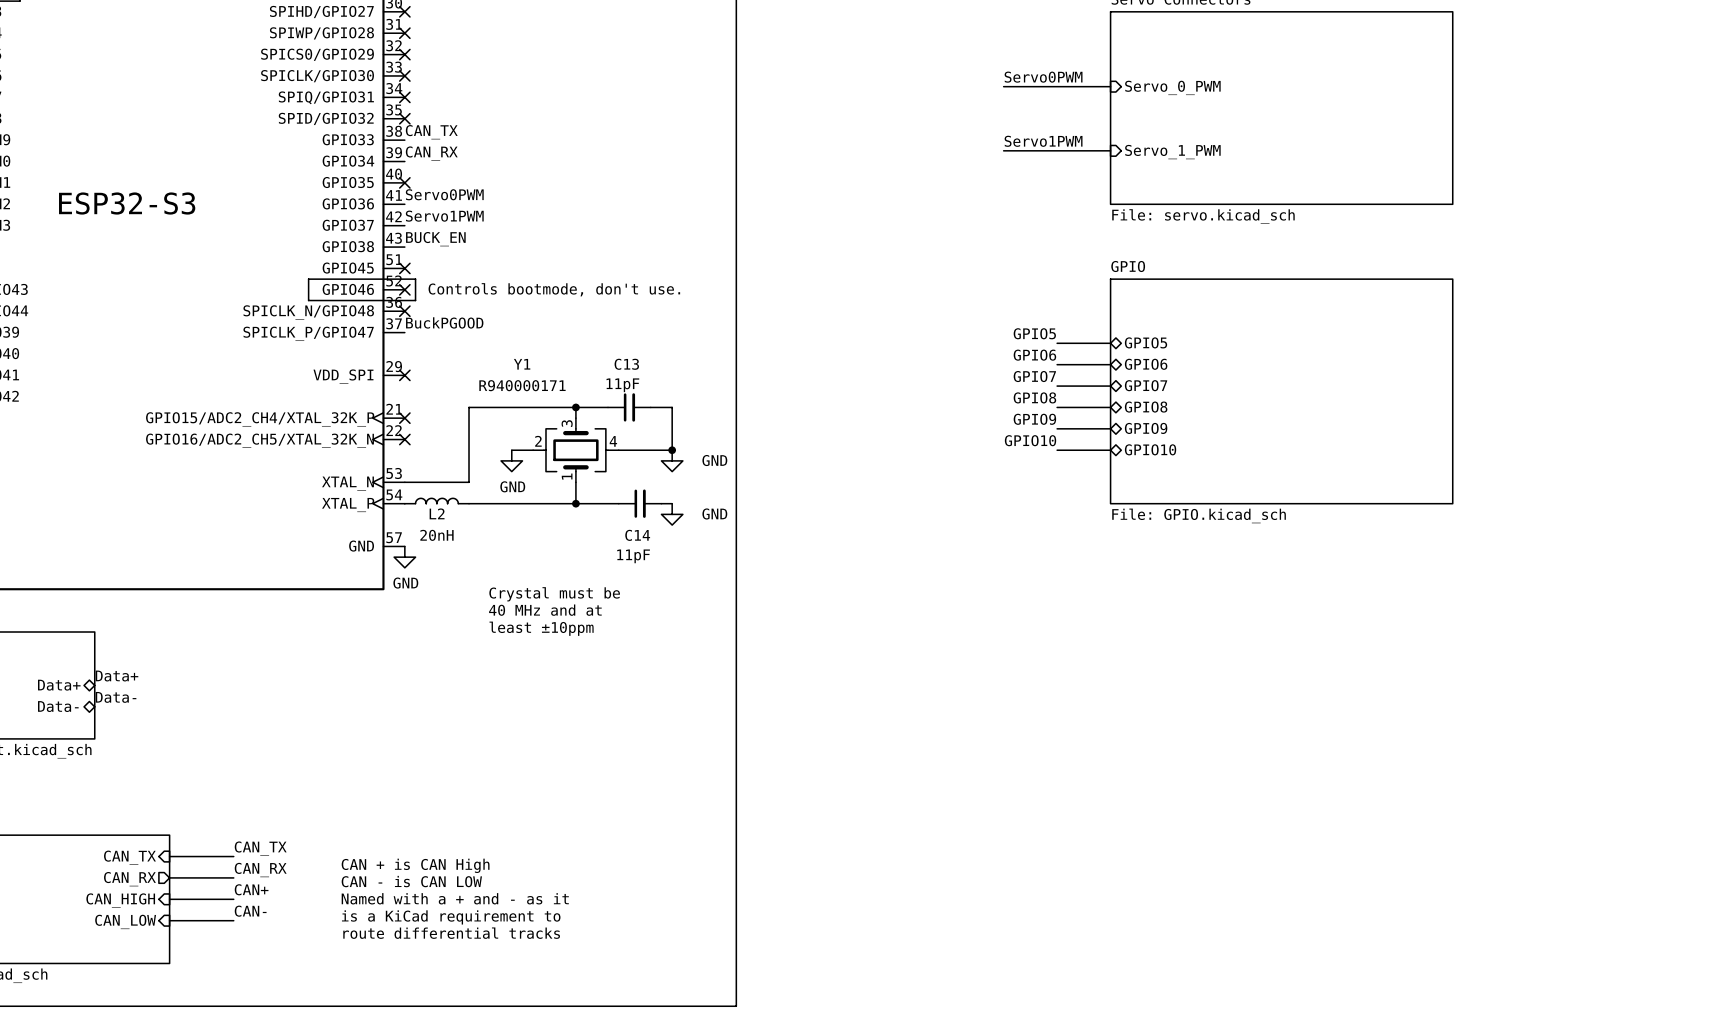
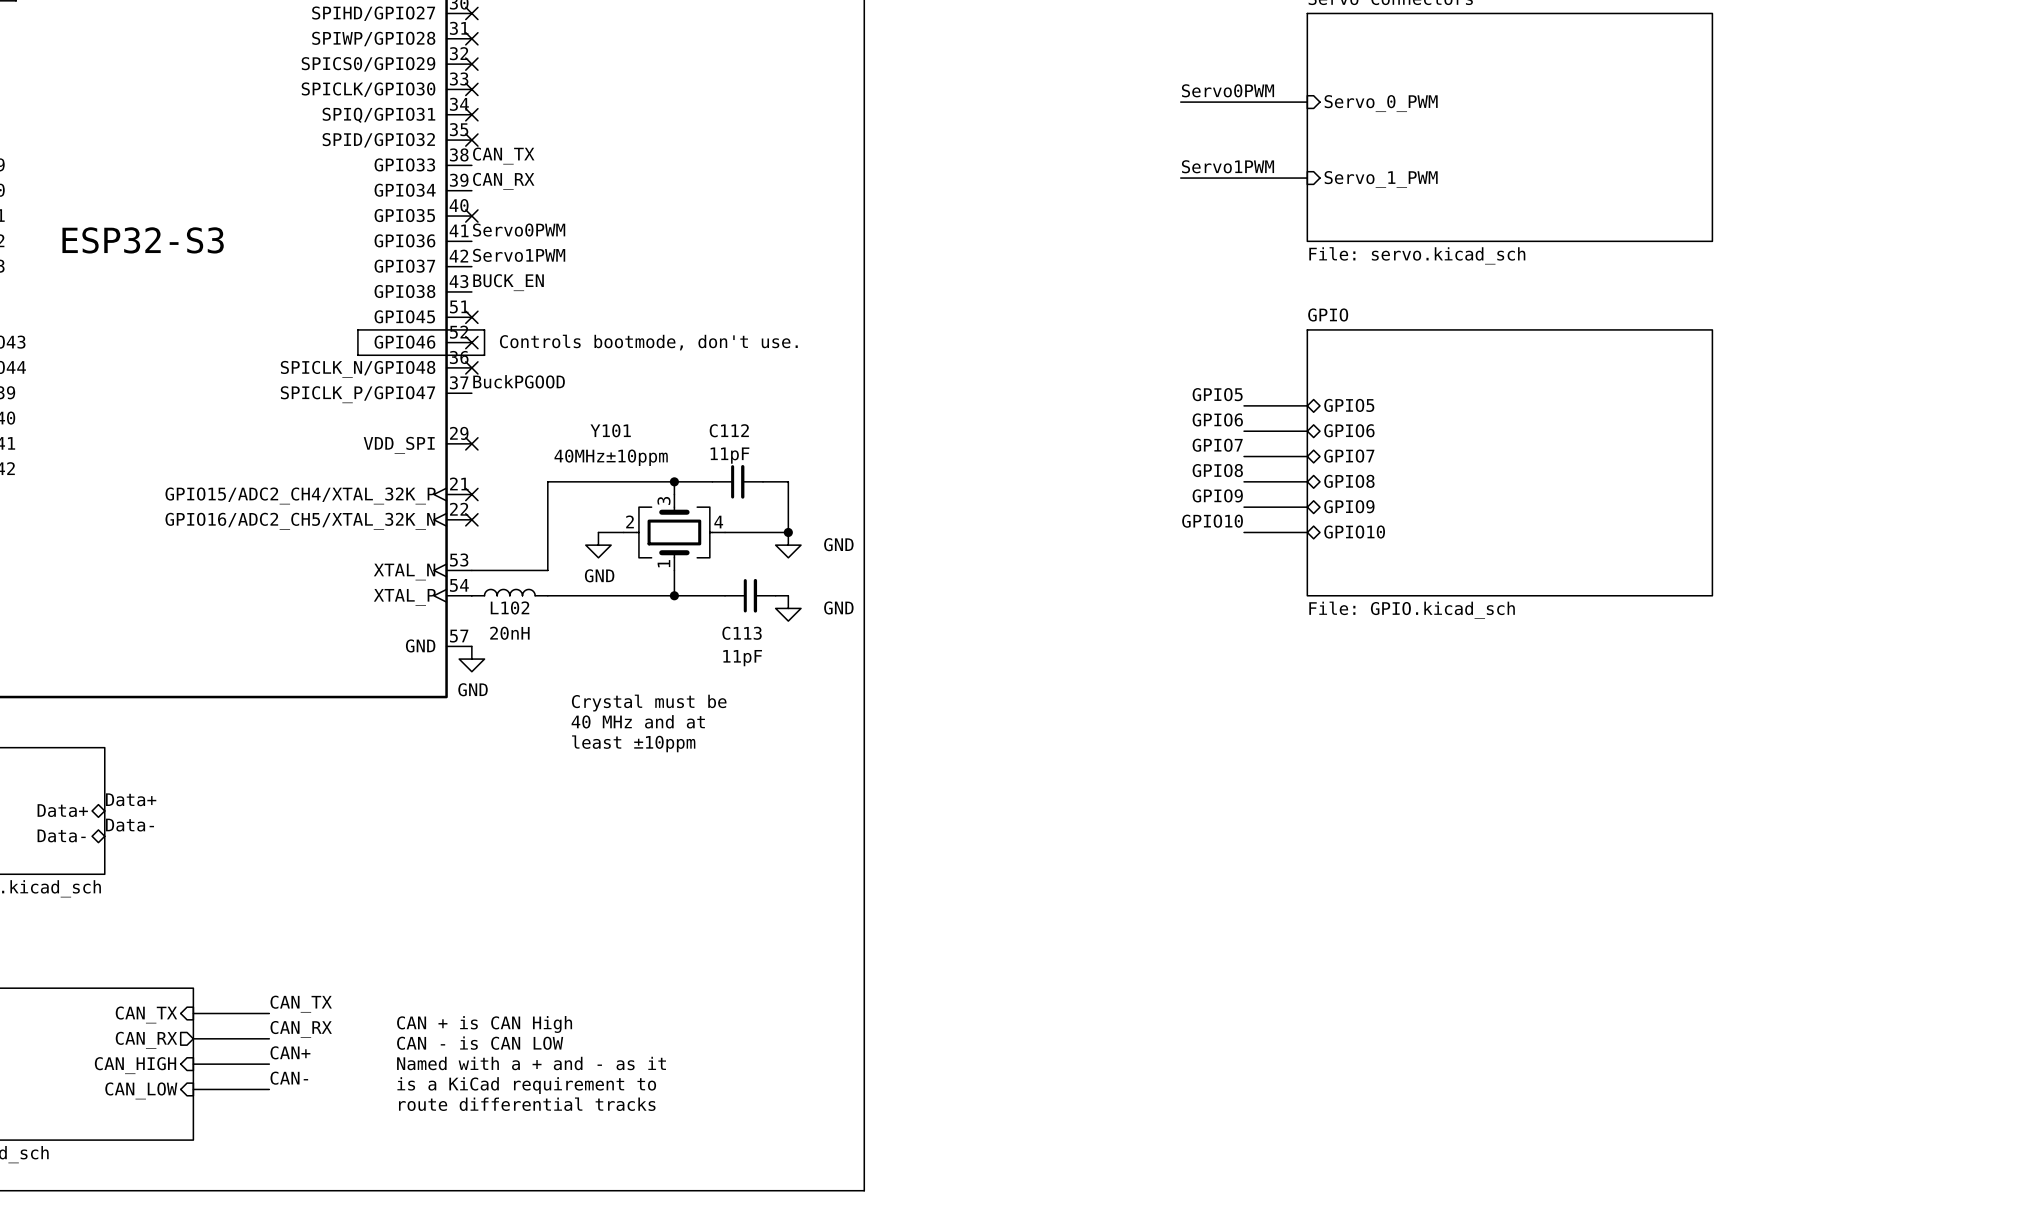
Y1 name: Y1 (522, 364) -> Y101 (610, 430)
C13 name: C13 (626, 364) -> C112 (729, 430)
Y1 value: R940000171 (522, 385) -> 40MHz±10ppm (611, 457)
L2 name: L2 (437, 513) -> L102 (510, 607)
C14 name: C14 (637, 535) -> C113 (742, 633)

